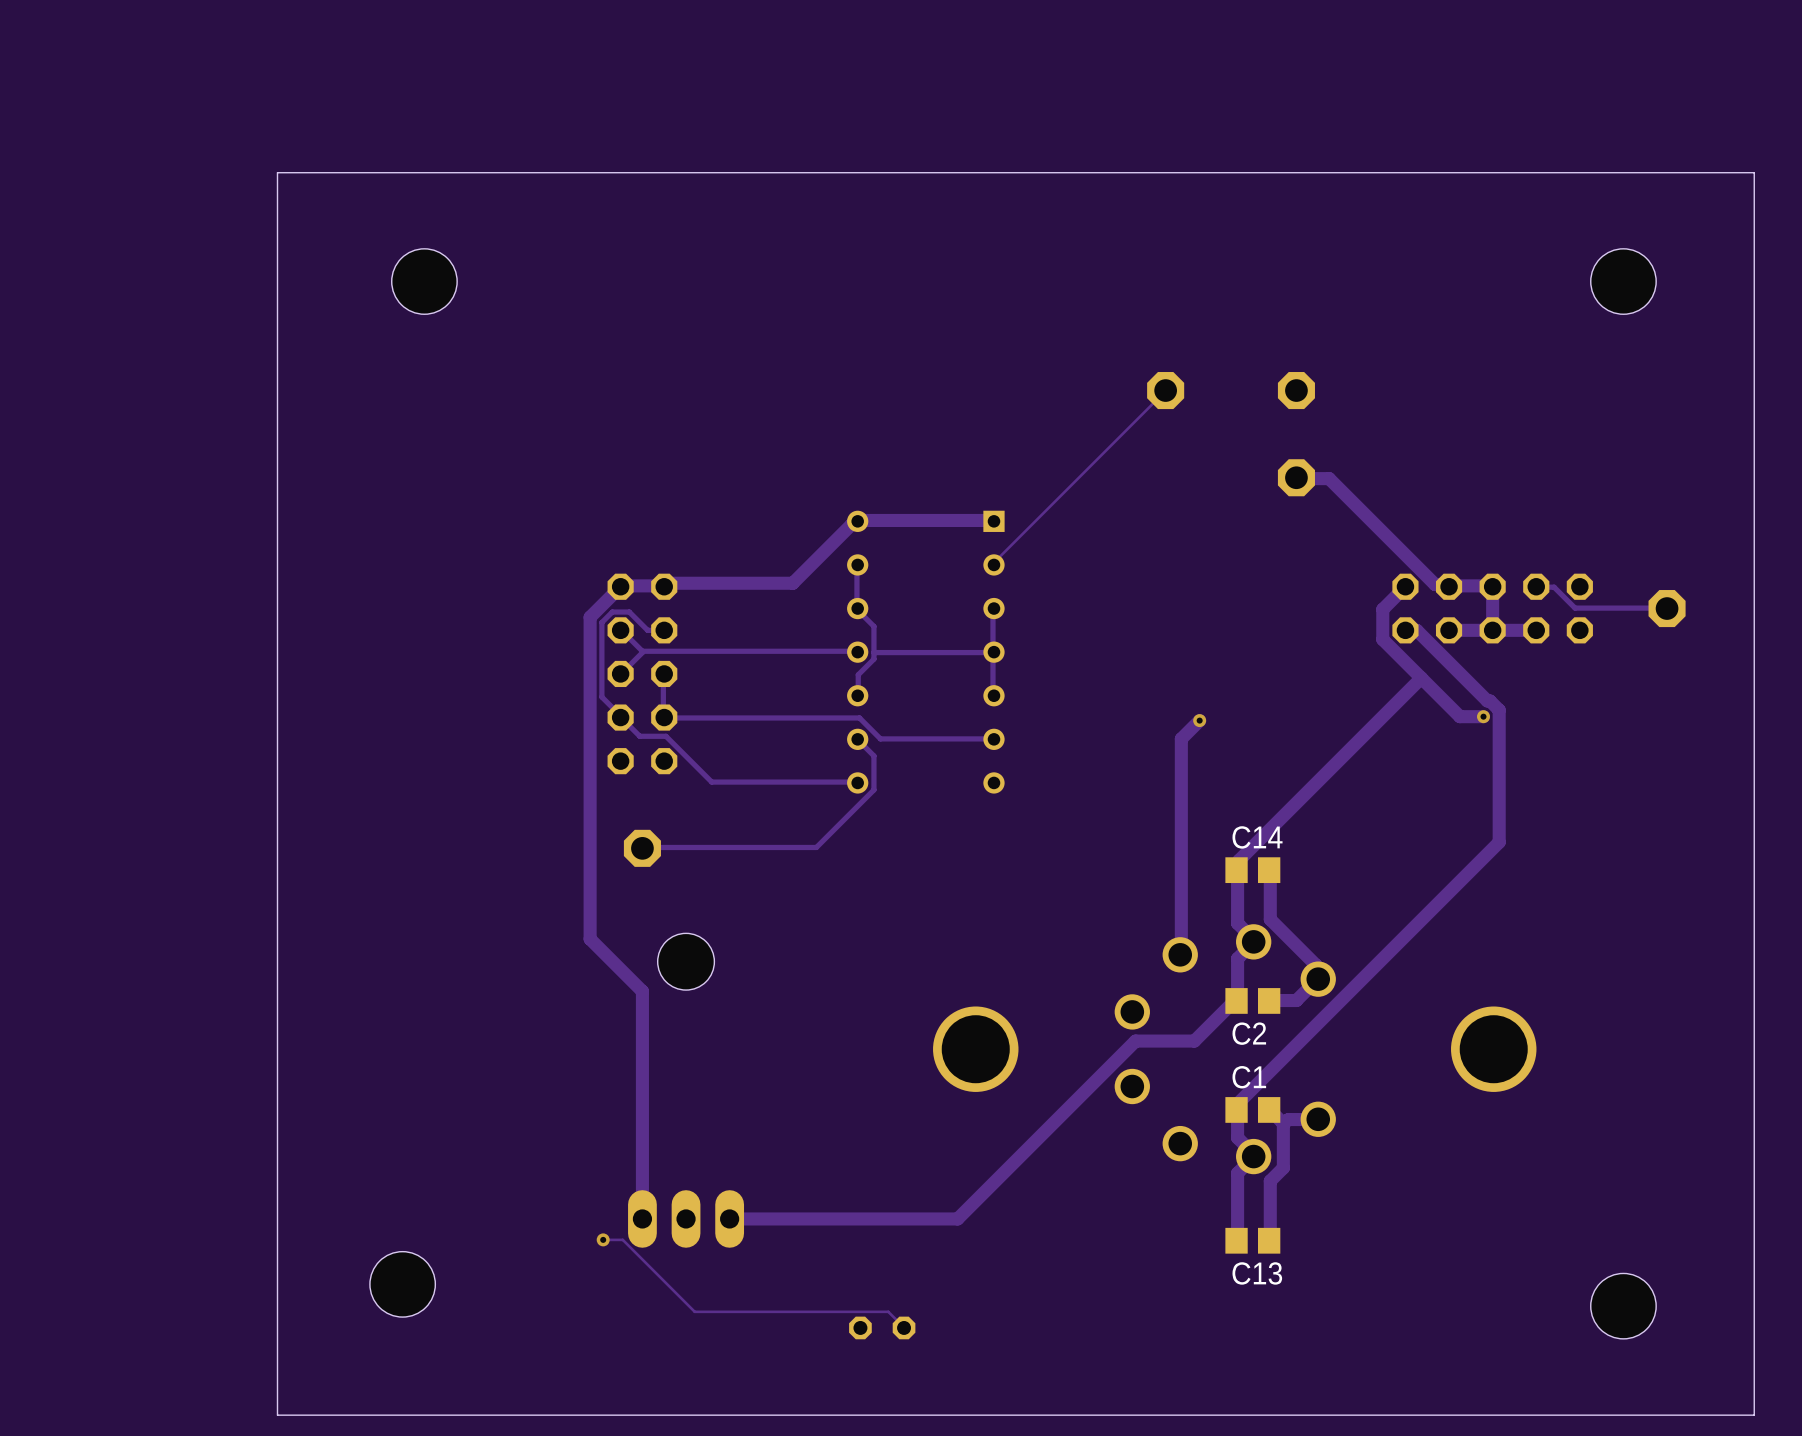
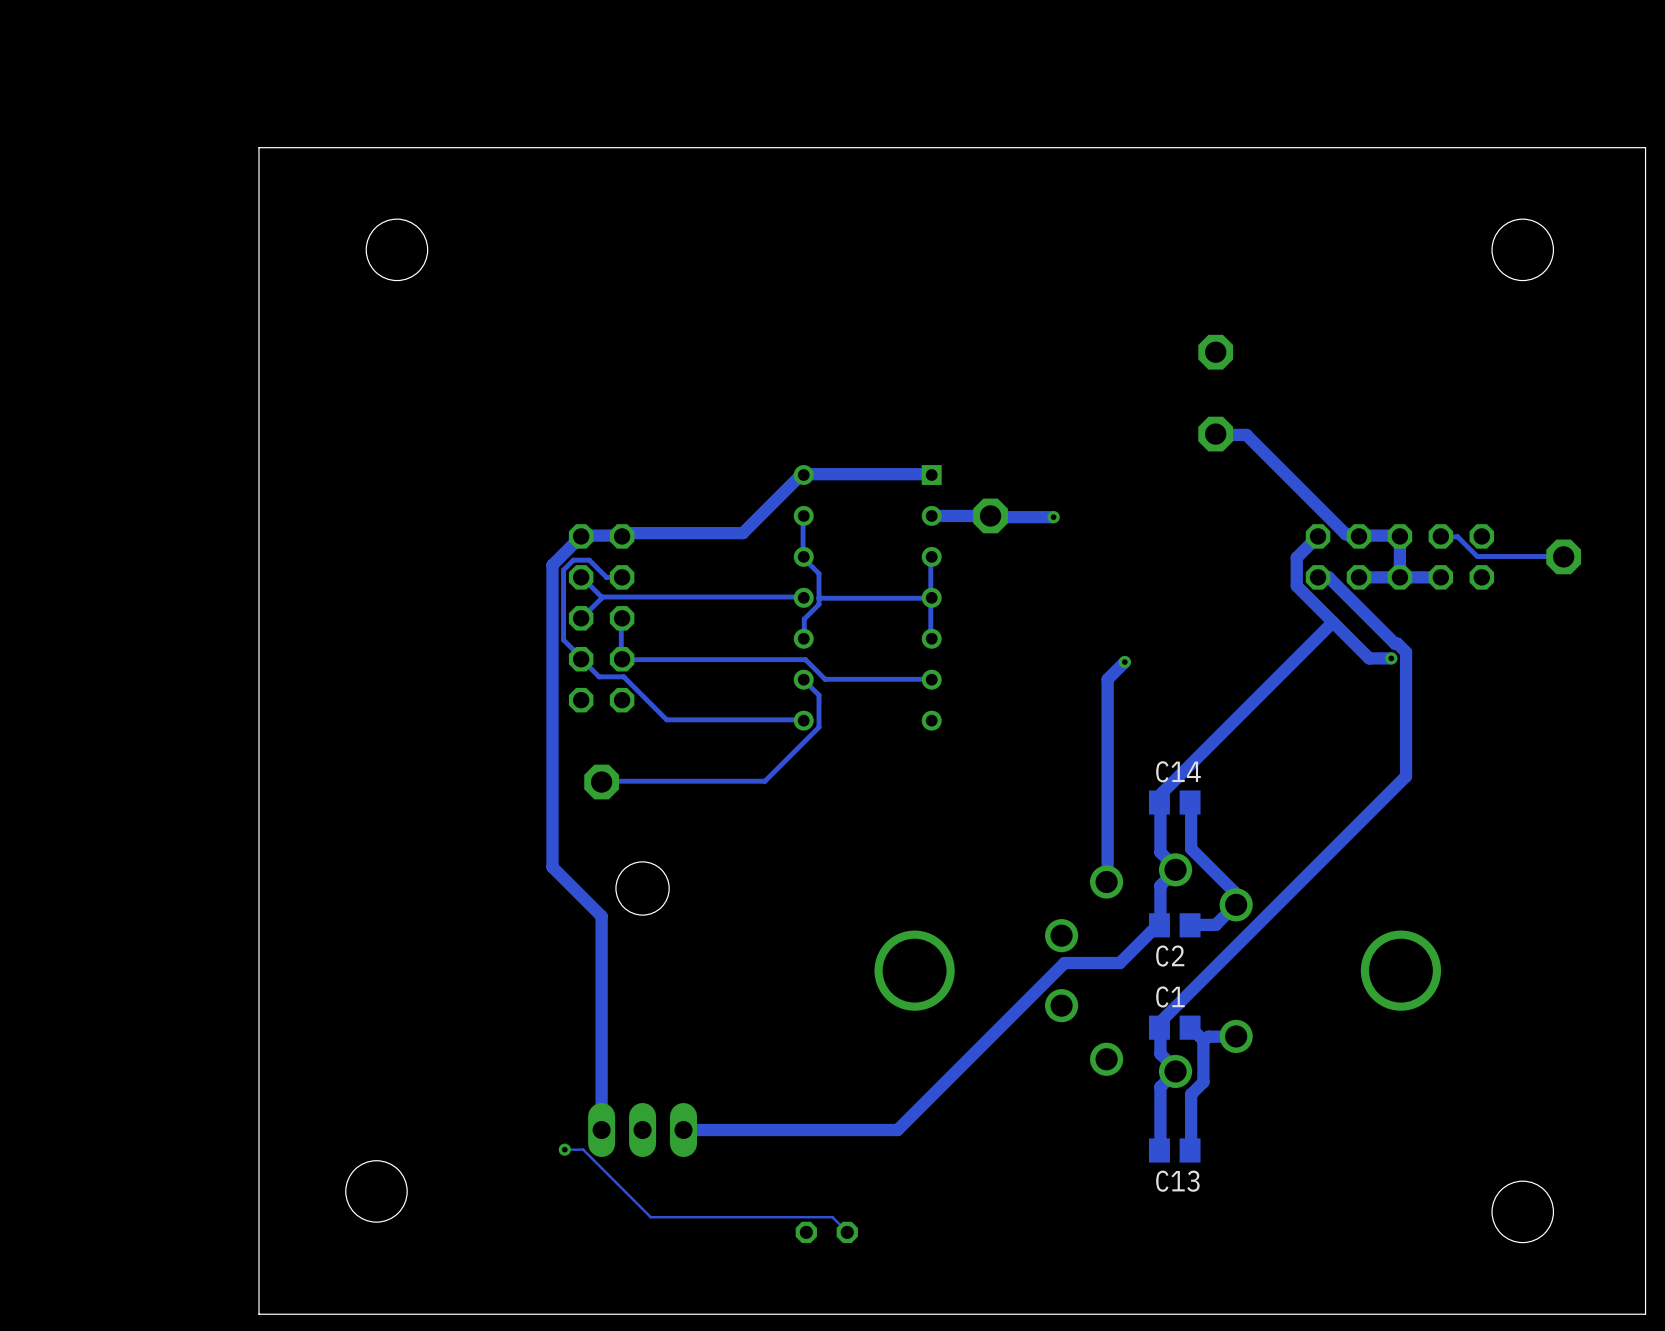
track: (1165, 390) (994, 562) (994, 564) -> (1053, 517) (931, 515)
part position: (1165, 390) -> (990, 515)
via: none -> (1053, 517)

